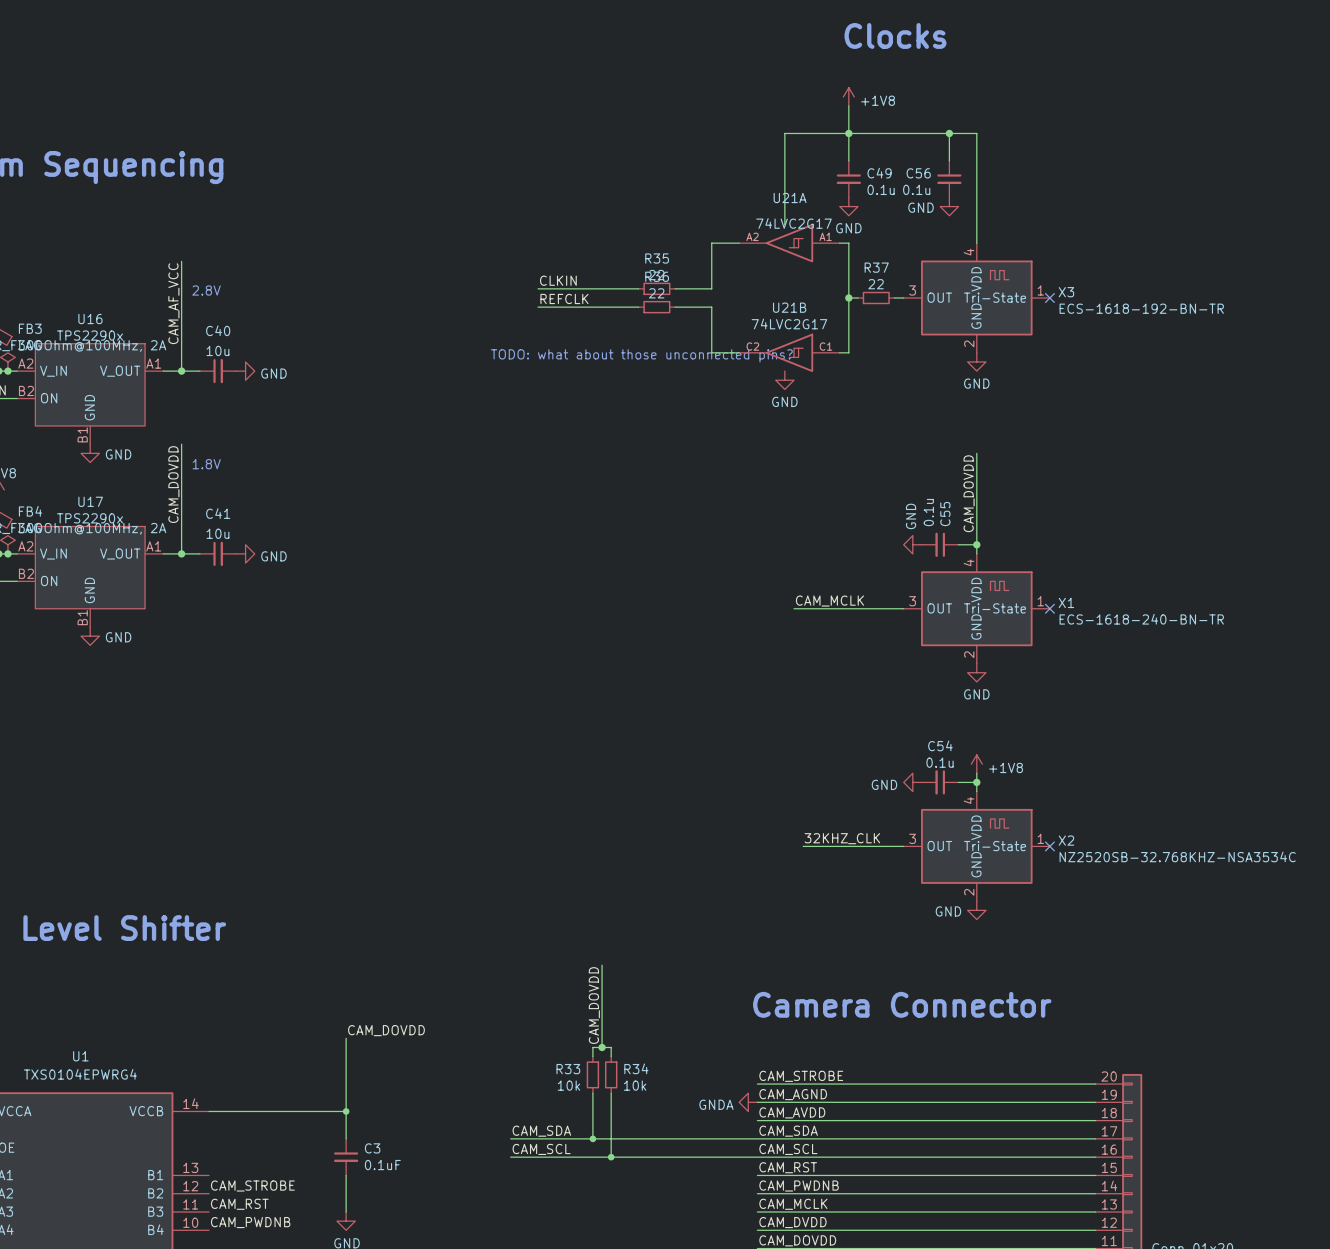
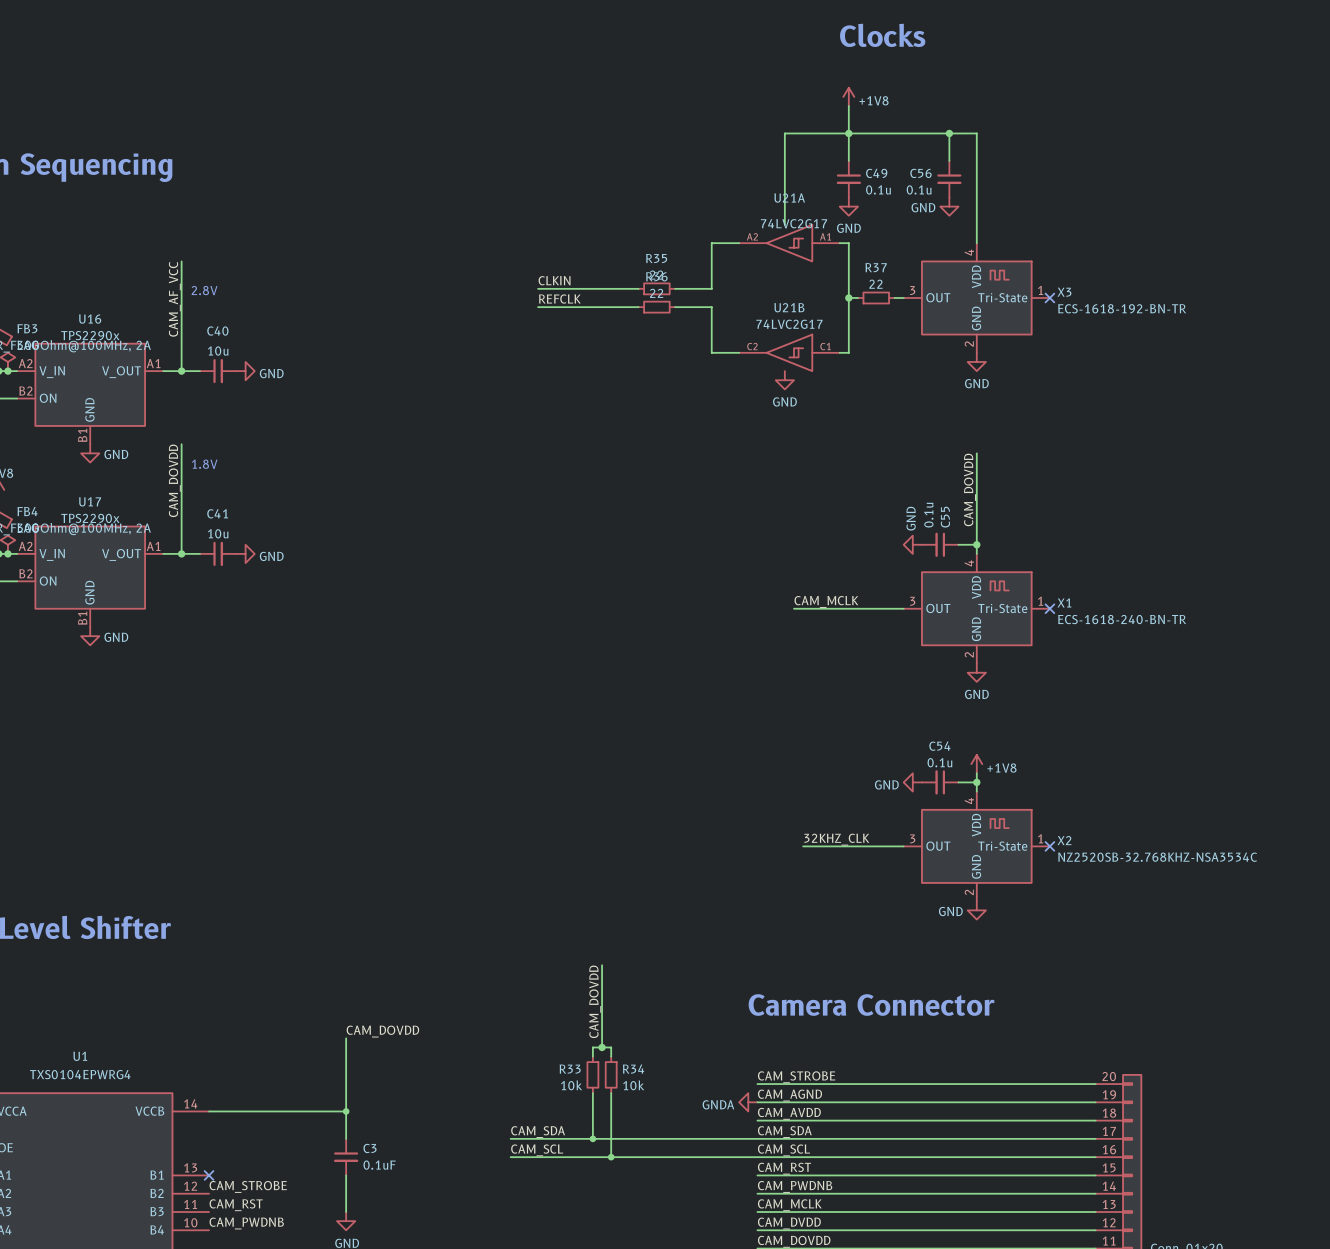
text: TODO: what about those unconnected pins? (641, 355) -> none
no-connect mark: none -> (209, 1175)

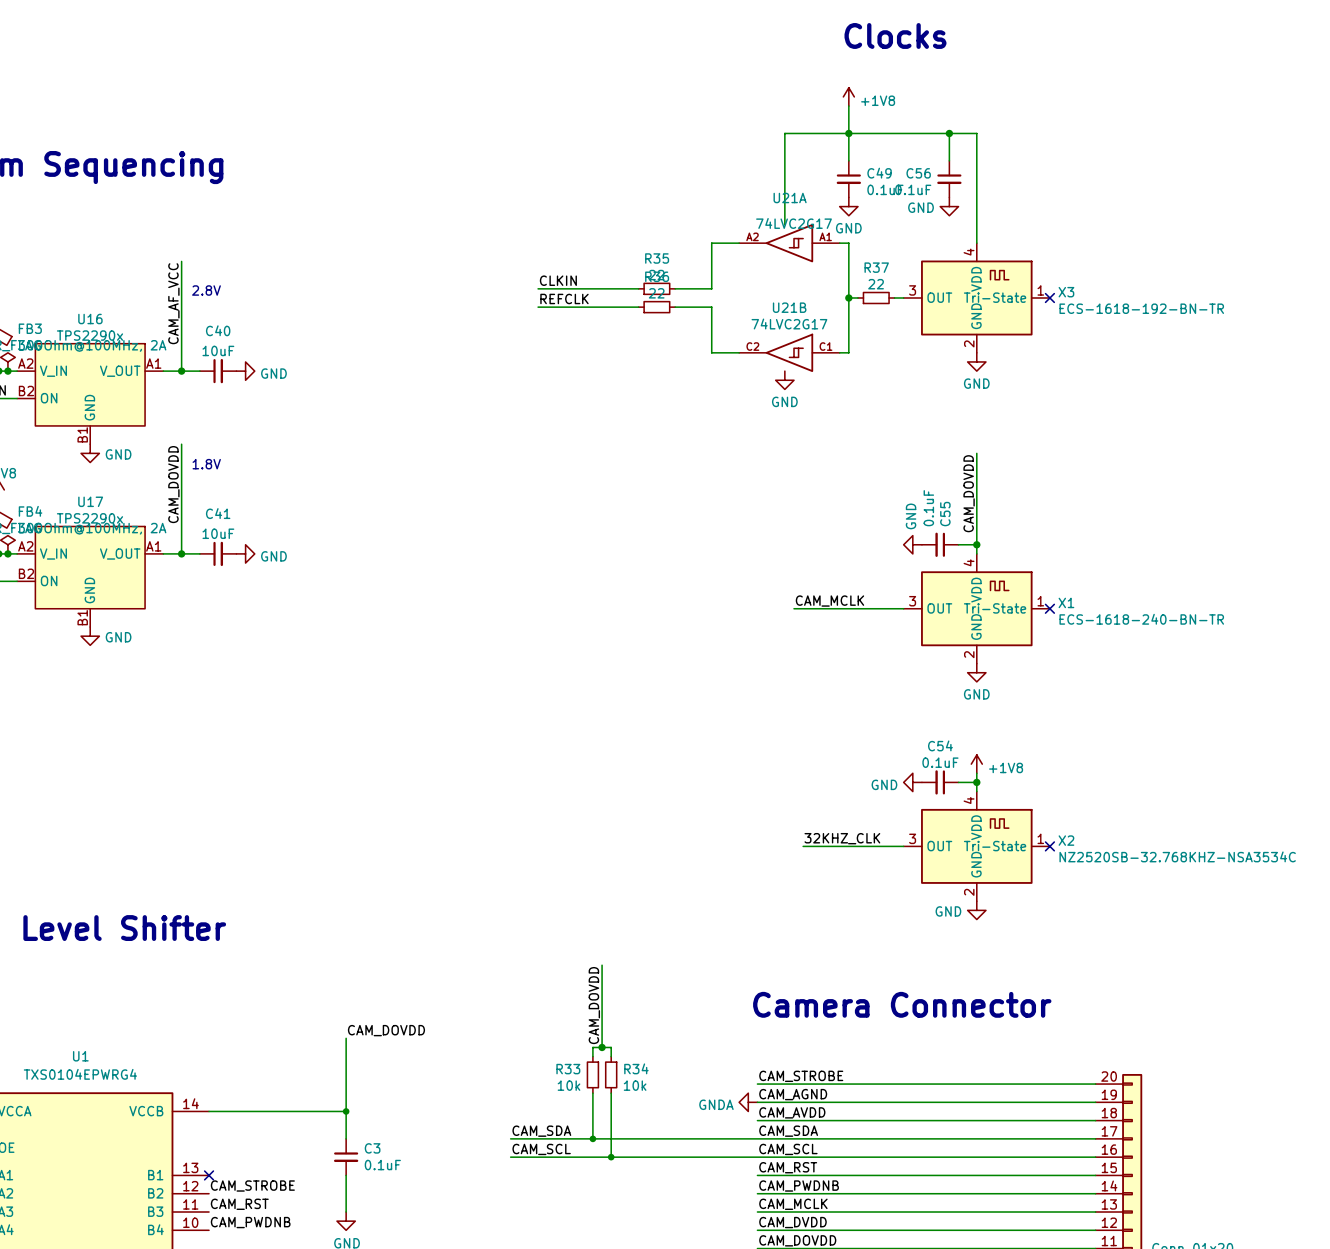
C49 value: 0.1u (878, 189) -> 0.1uF (885, 189)
C56 value: 0.1u (919, 189) -> 0.1uF (913, 189)
C40 value: 10u (218, 351) -> 10uF (218, 350)
C55 value: 0.1u (928, 515) -> 0.1uF (928, 508)
C41 value: 10u (218, 533) -> 10uF (218, 533)
C54 value: 0.1u (939, 762) -> 0.1uF (940, 762)

